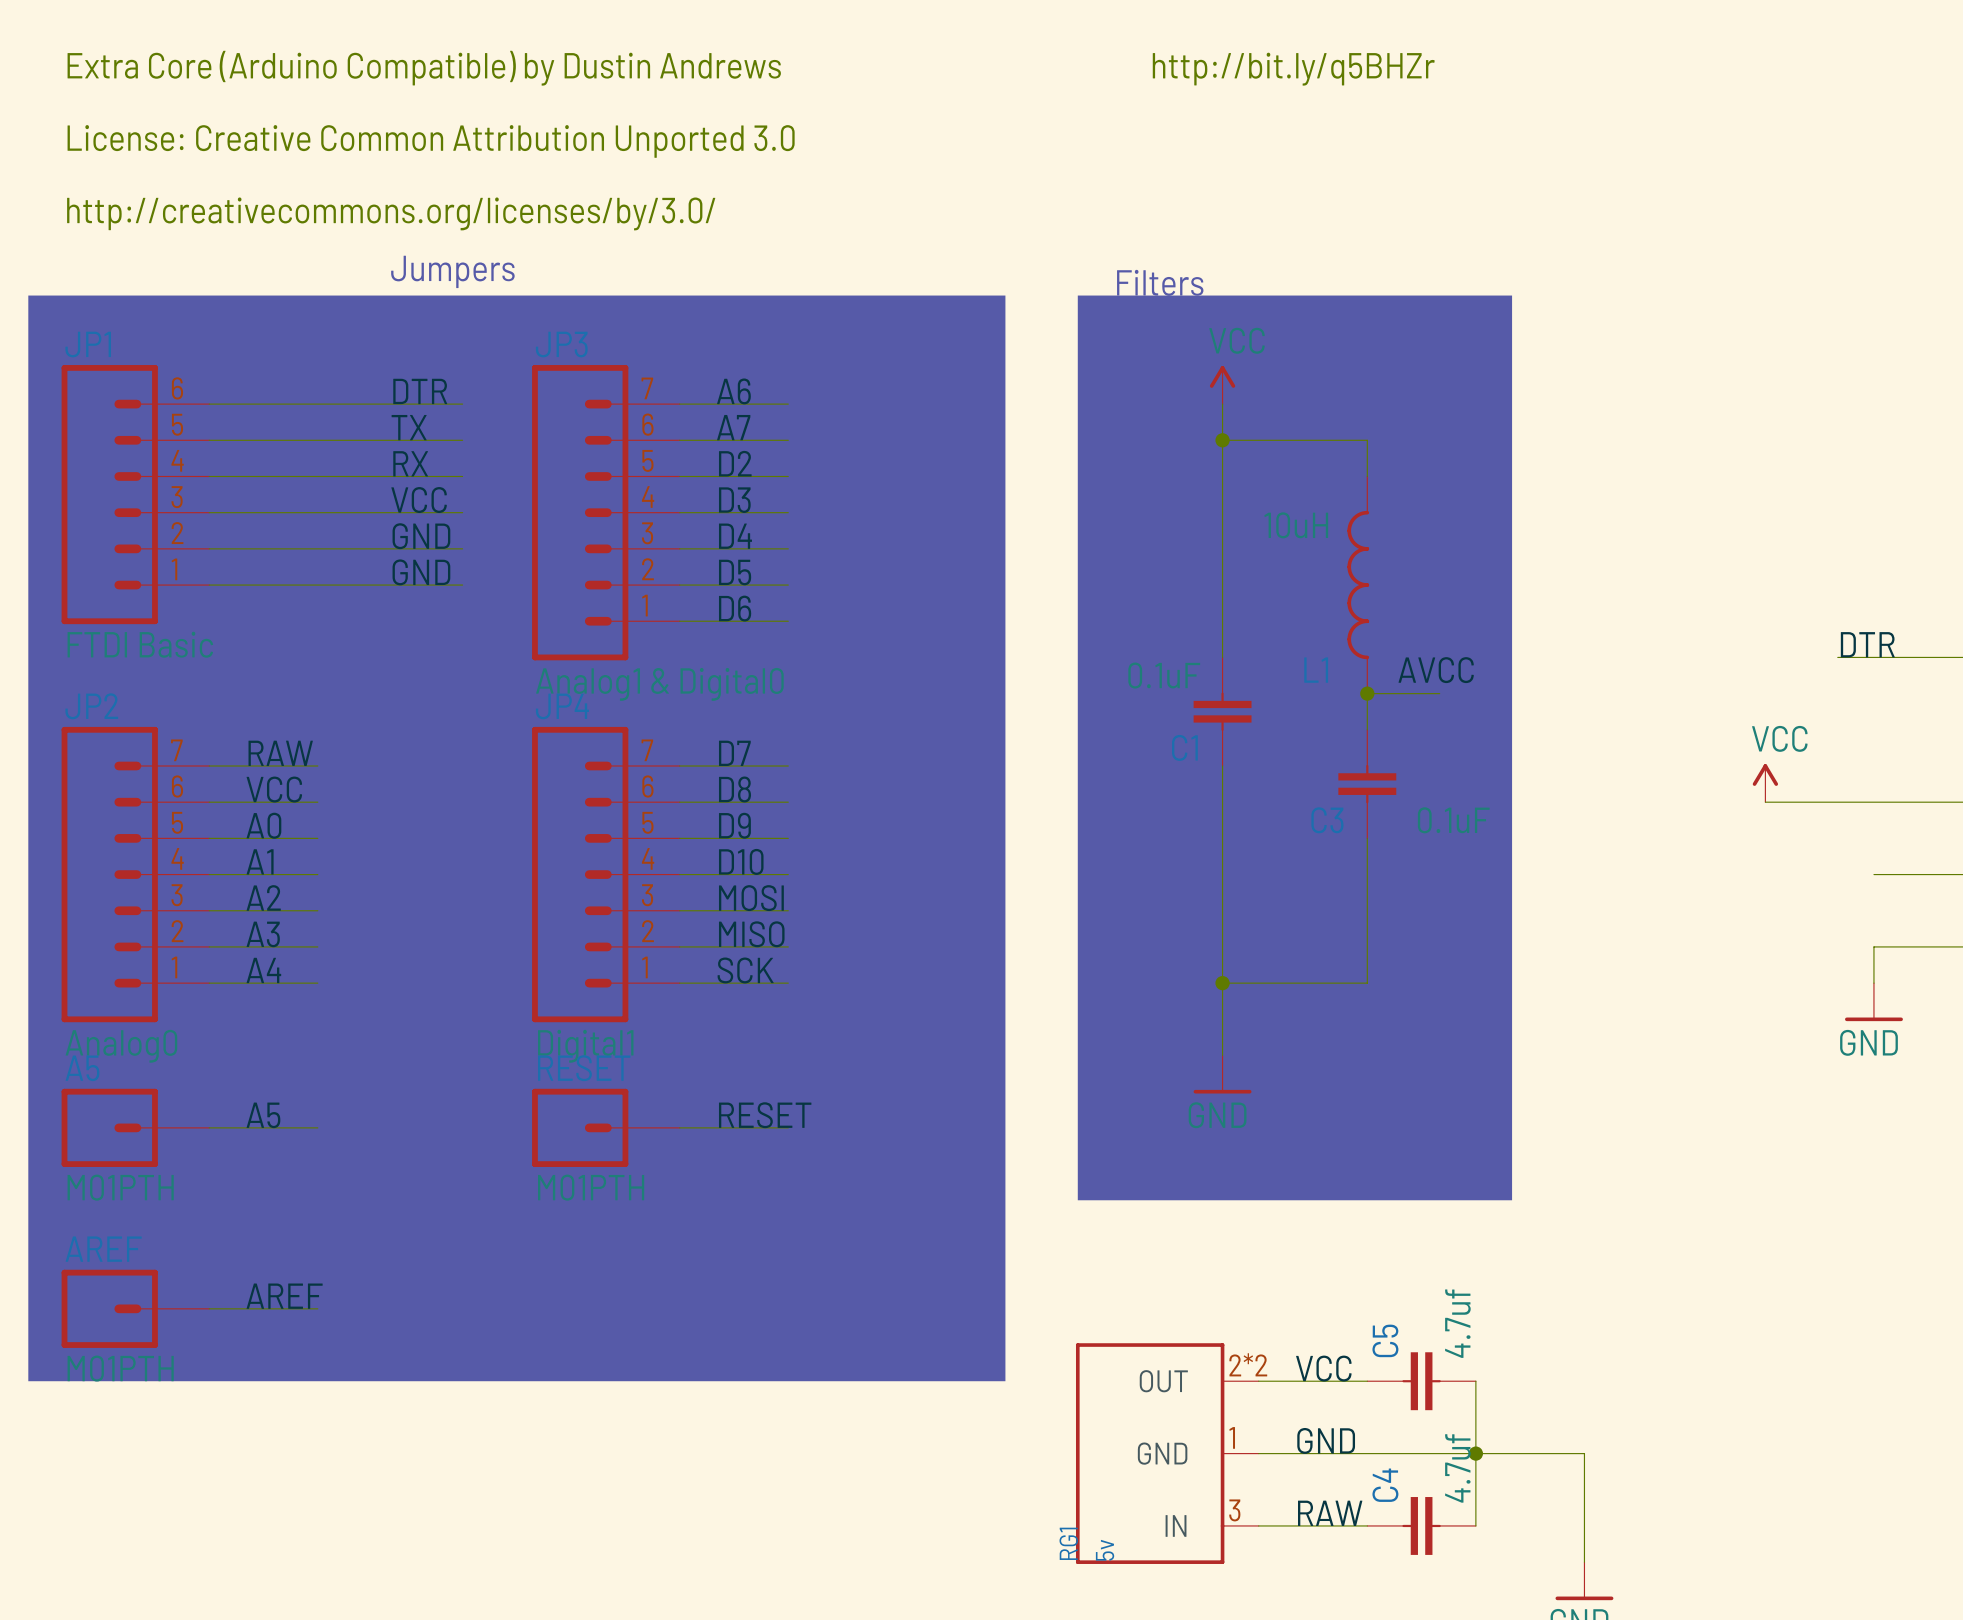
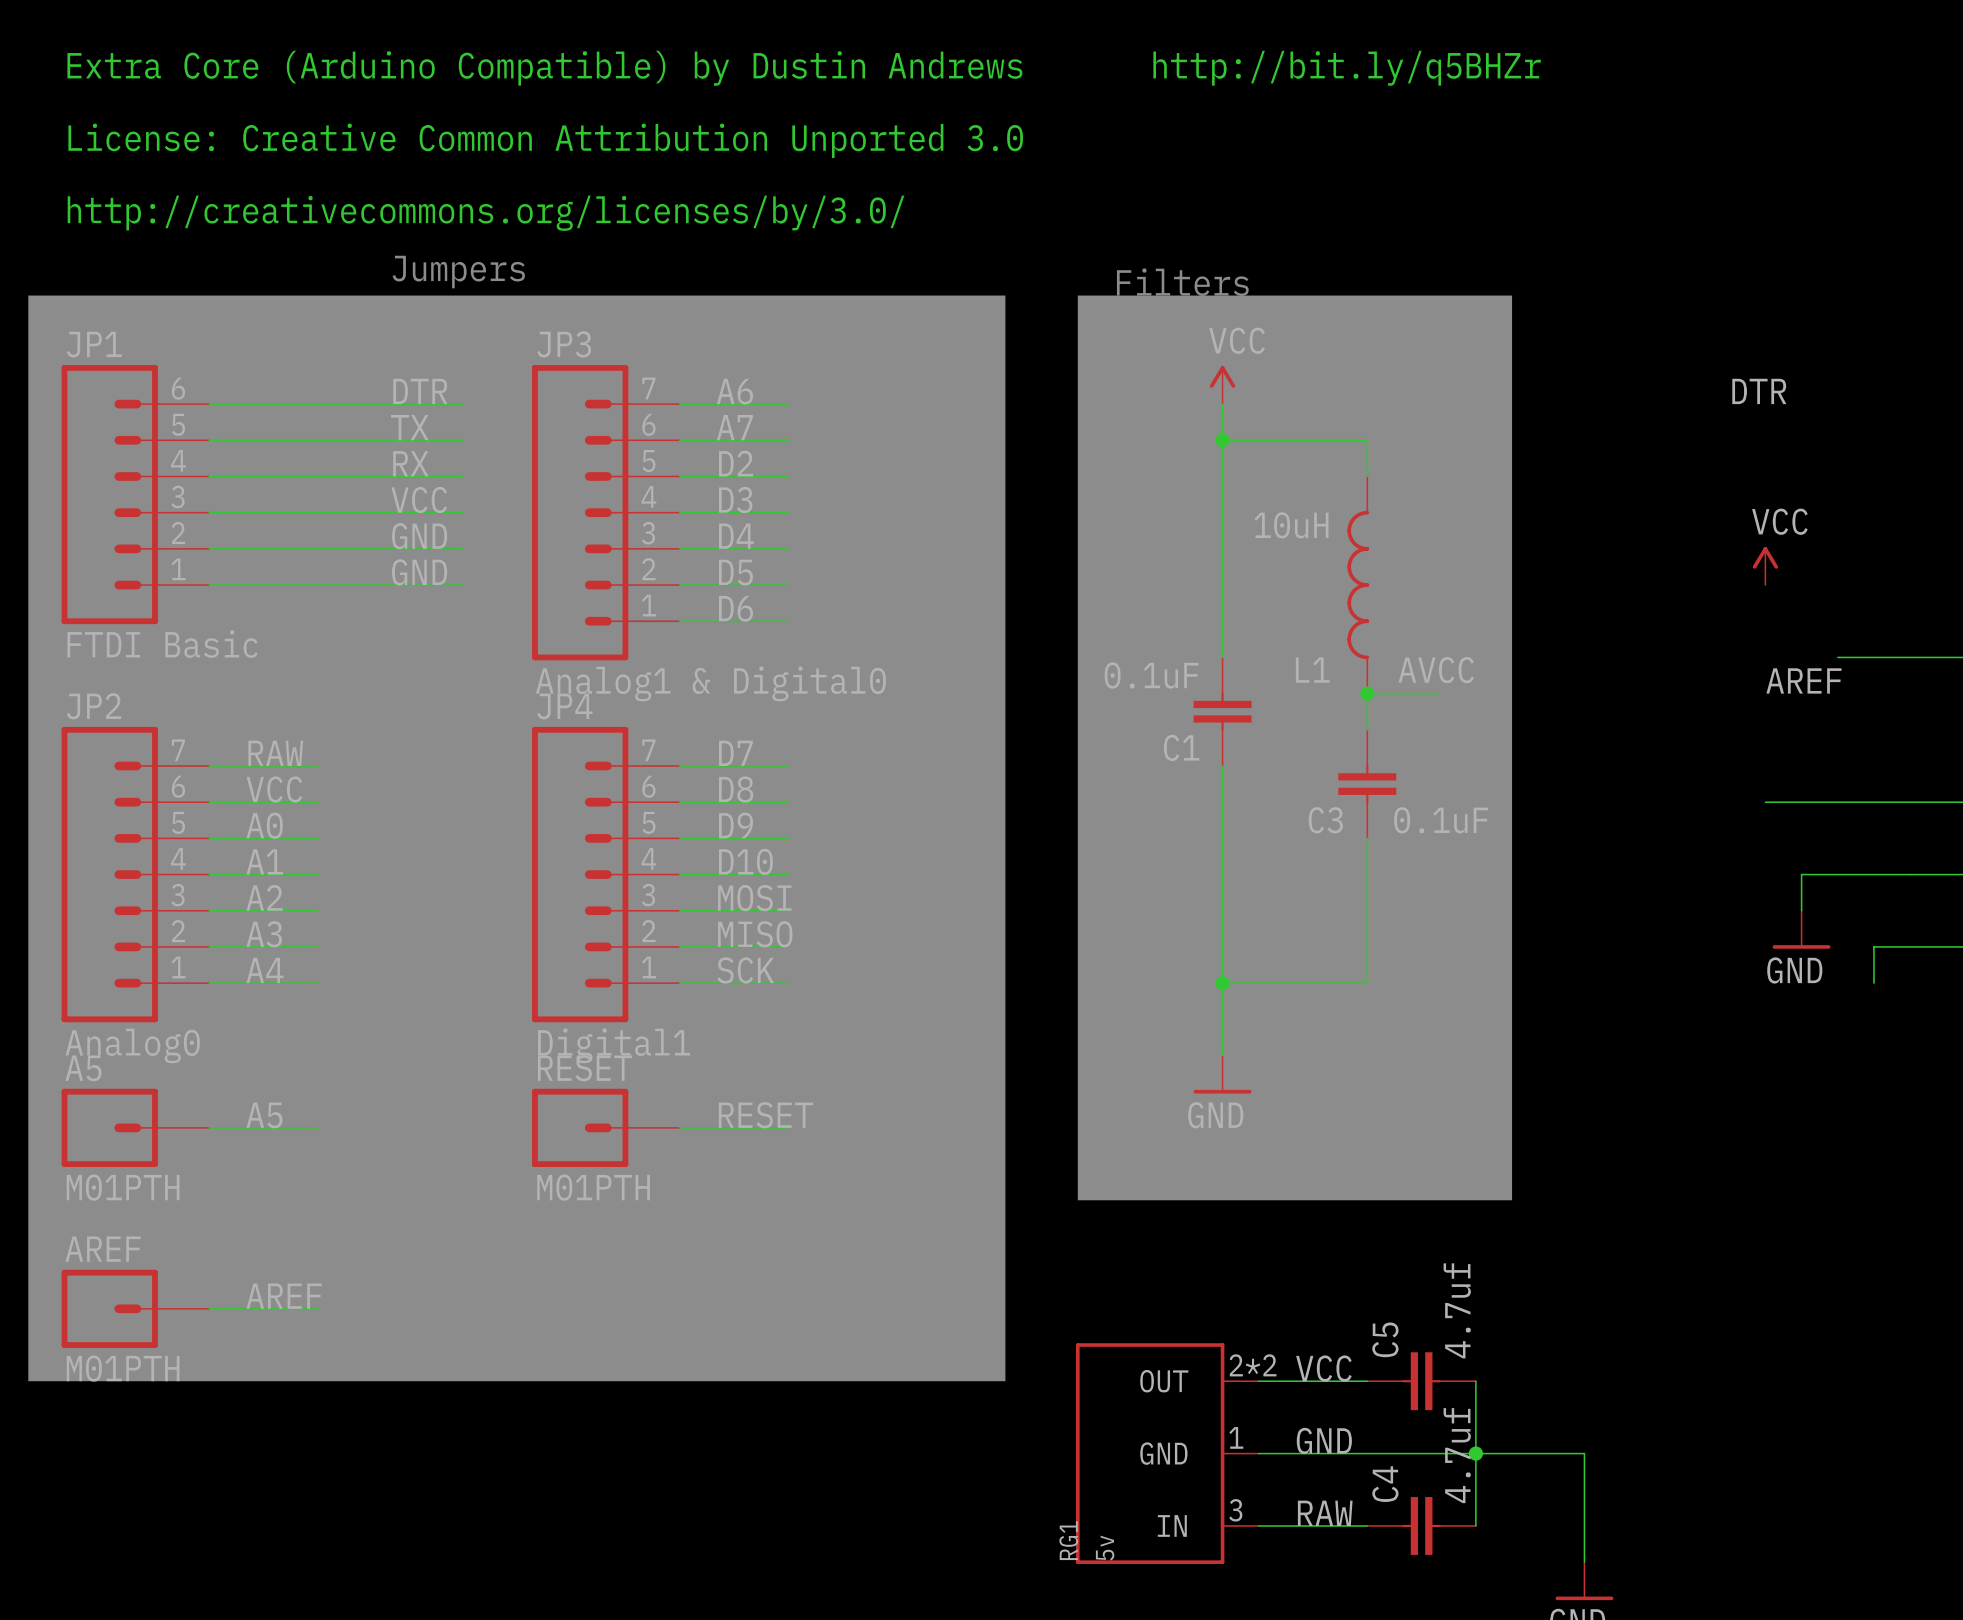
label position: DTR (1867, 644) -> DTR (1759, 391)
label: none -> AREF (1803, 680)
power symbol position: VCC (1765, 783) -> VCC (1765, 566)
wire: none -> (1873, 874) (1801, 874) (1801, 910)
power symbol position: GND (1873, 1002) -> GND (1801, 929)

